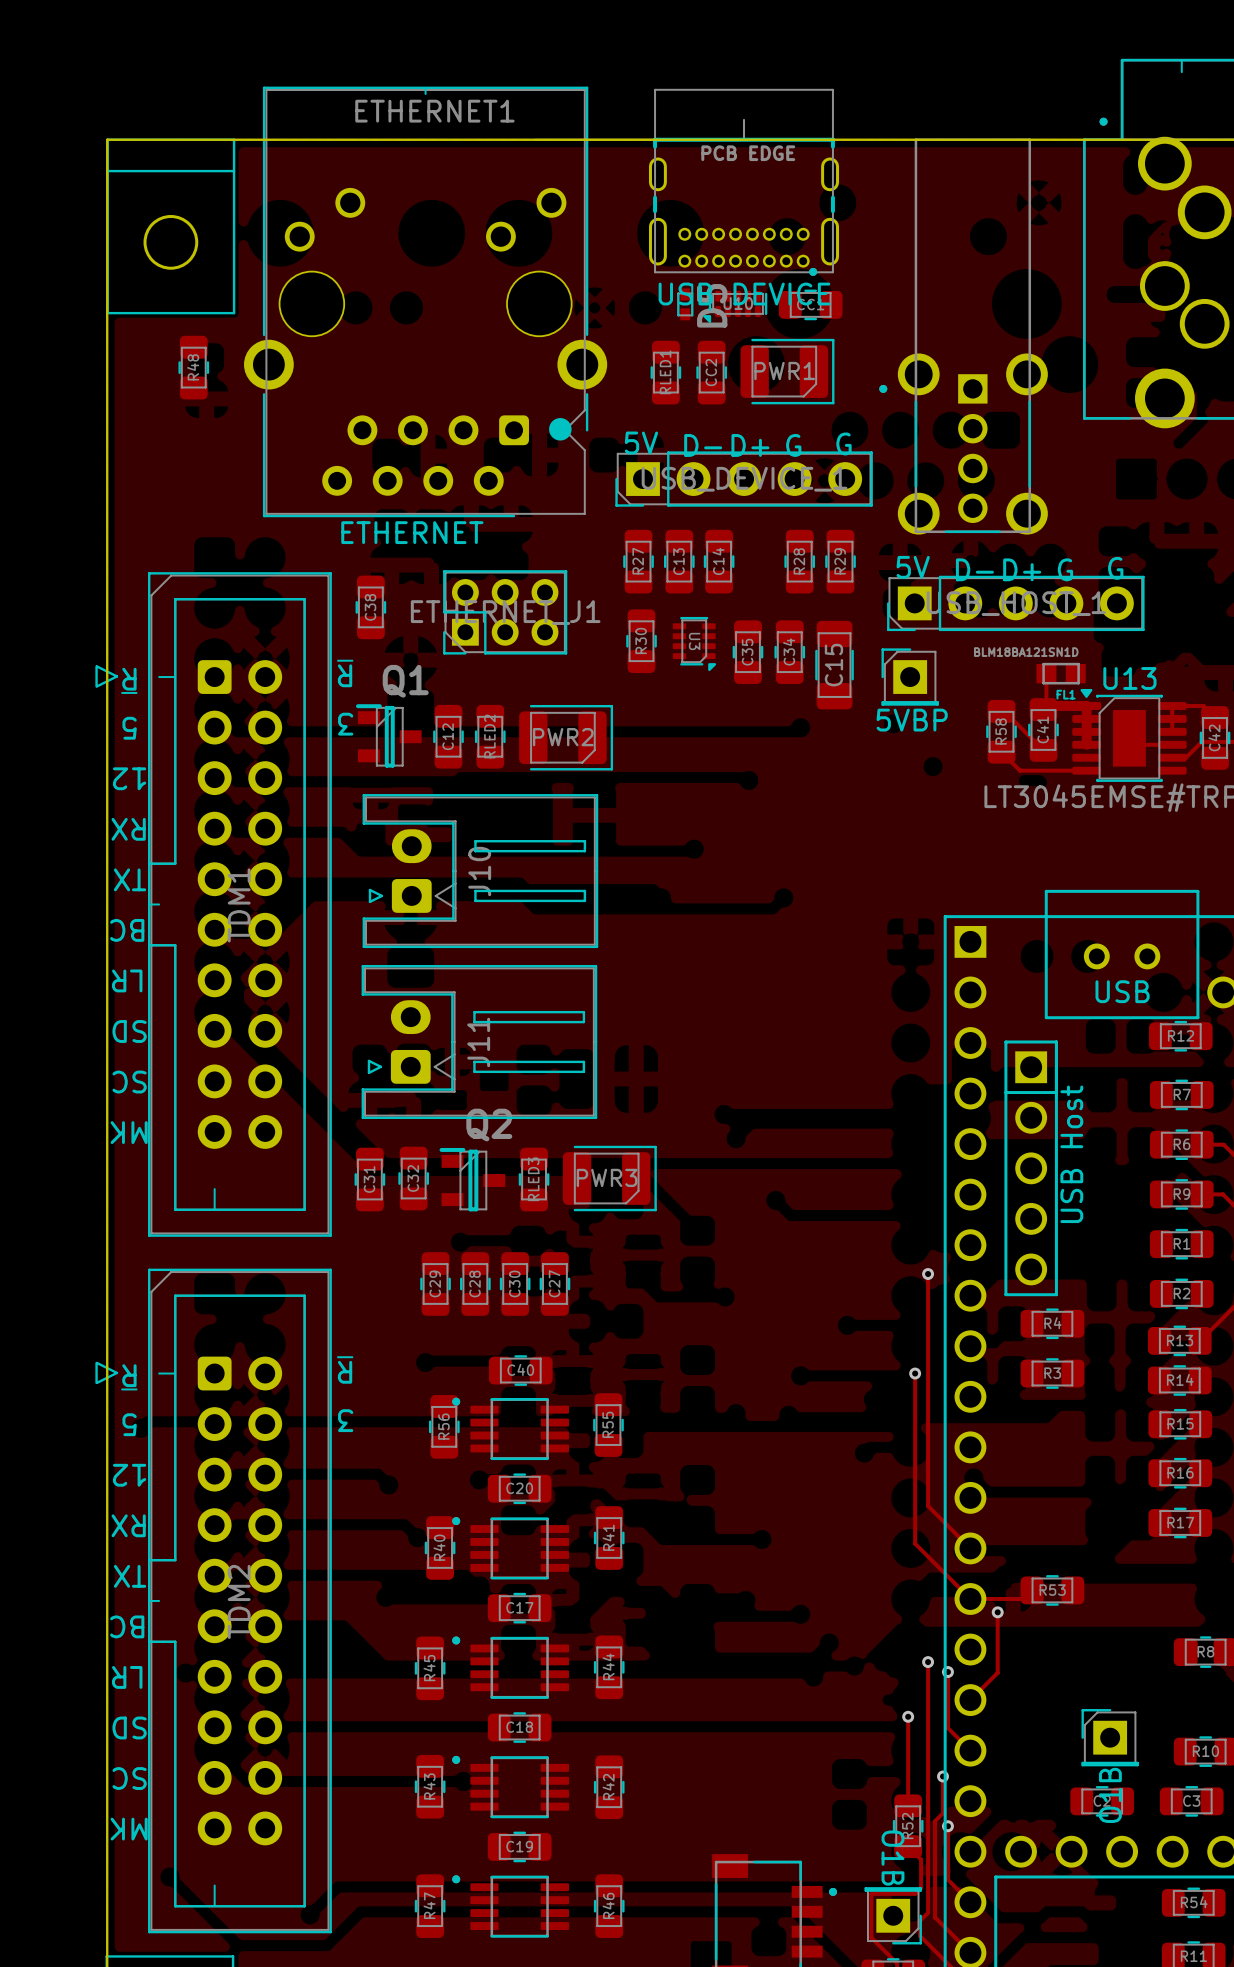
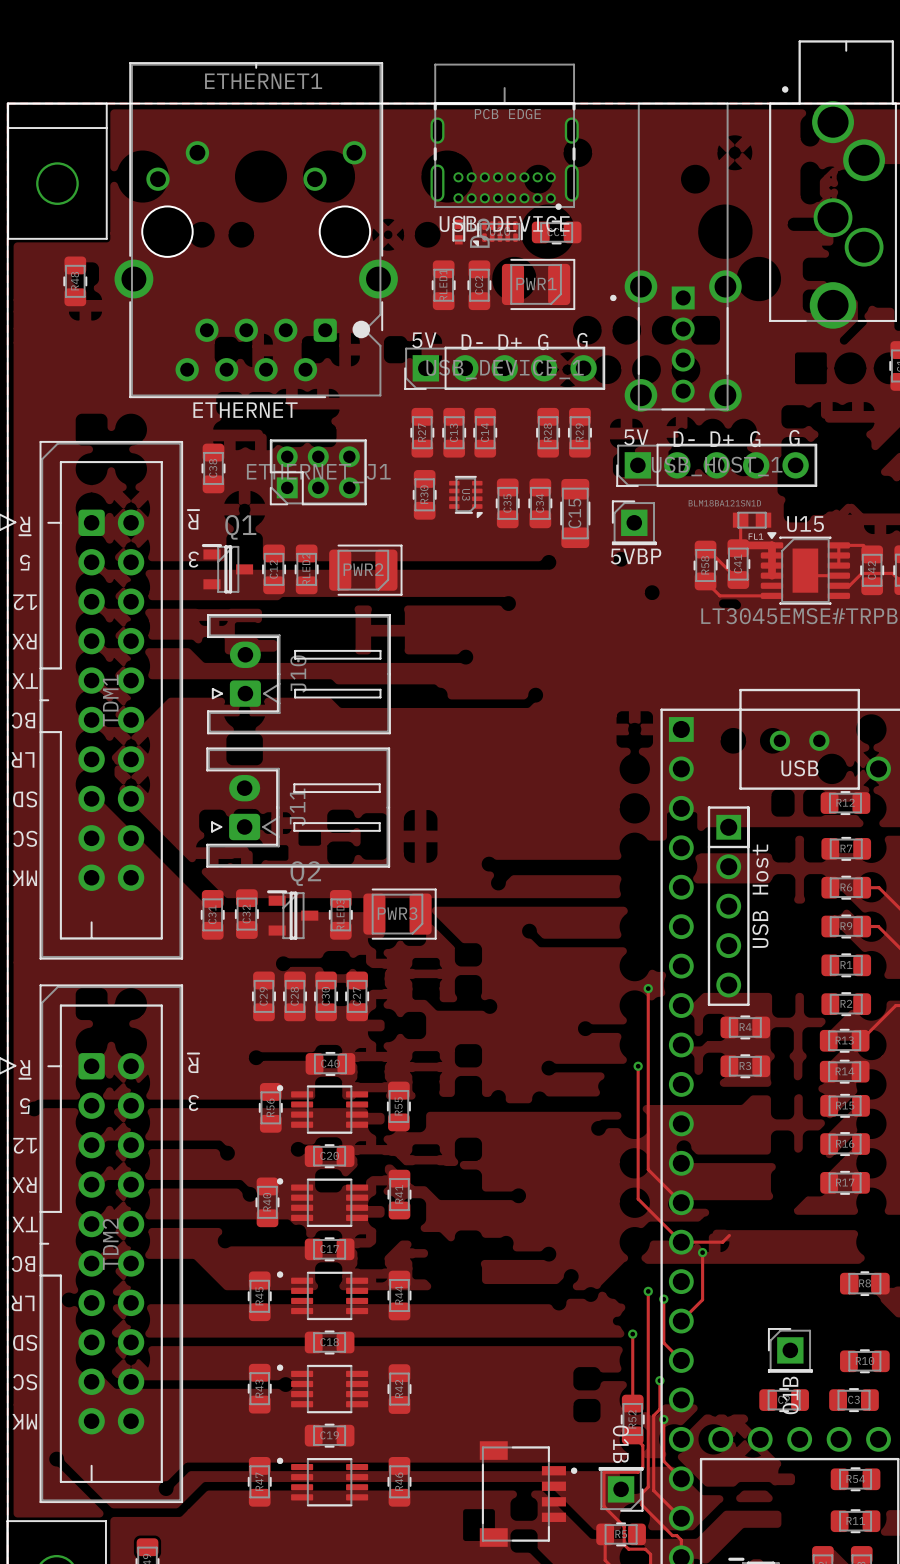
U13 name: U13 (1129, 678) -> U15 (805, 524)
R53: (1052, 1590) -> none

